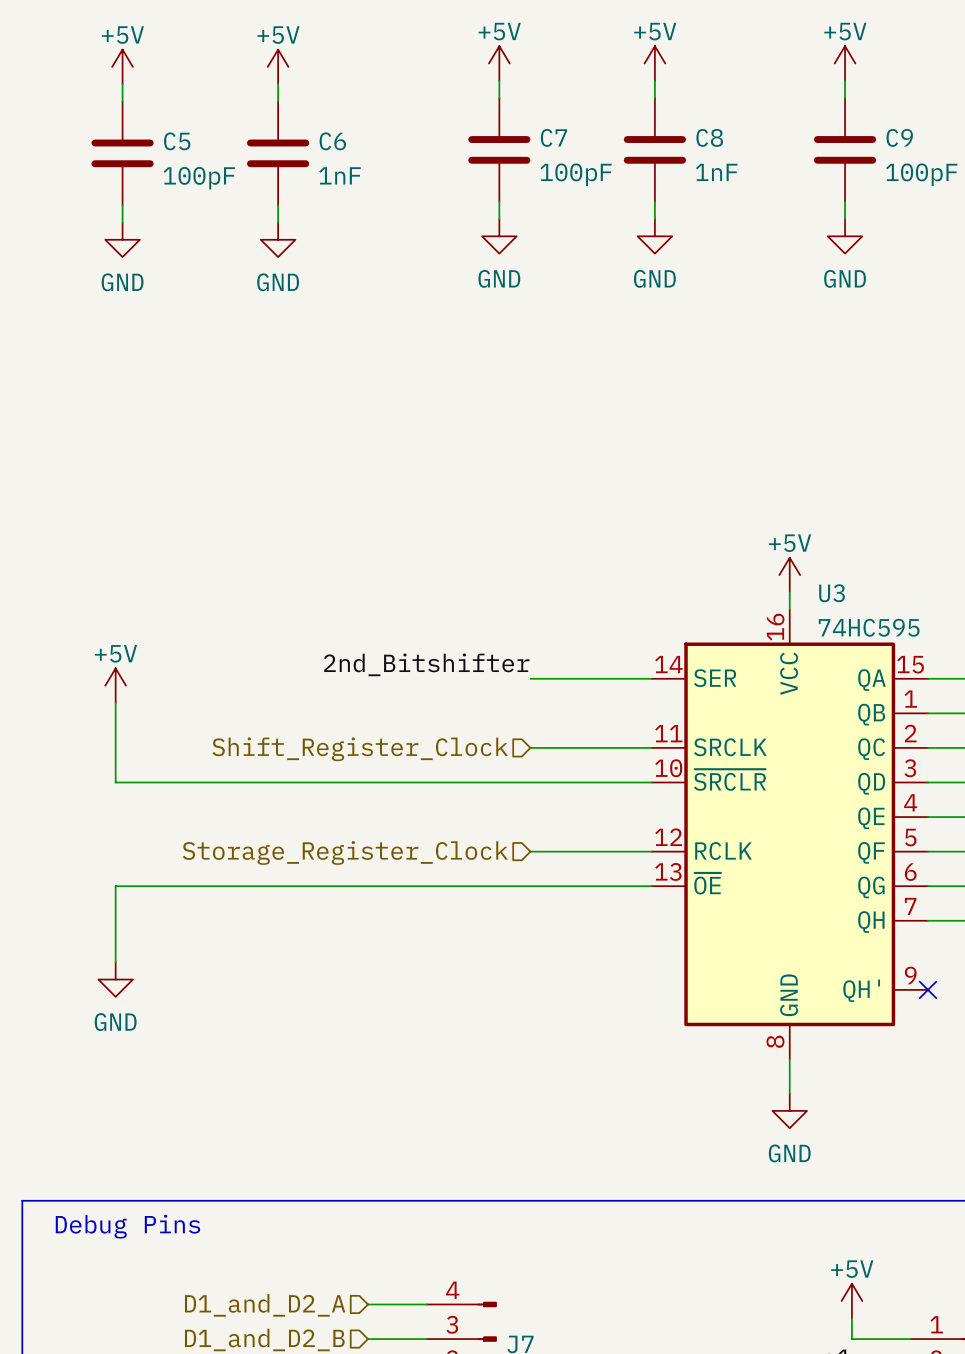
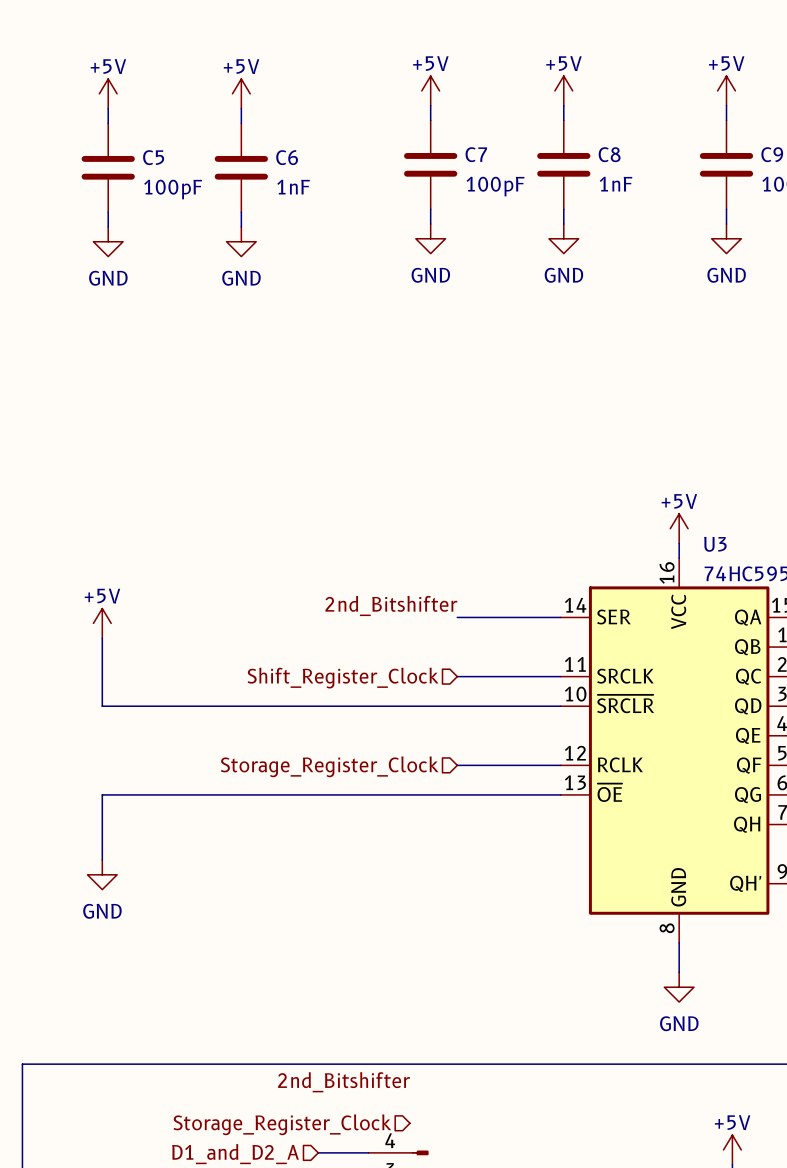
label: none -> 2nd_Bitshifter (344, 1082)
text: Debug Pins (127, 1226) -> none
hierarchical label: none -> Storage_Register_Clock (282, 1124)

